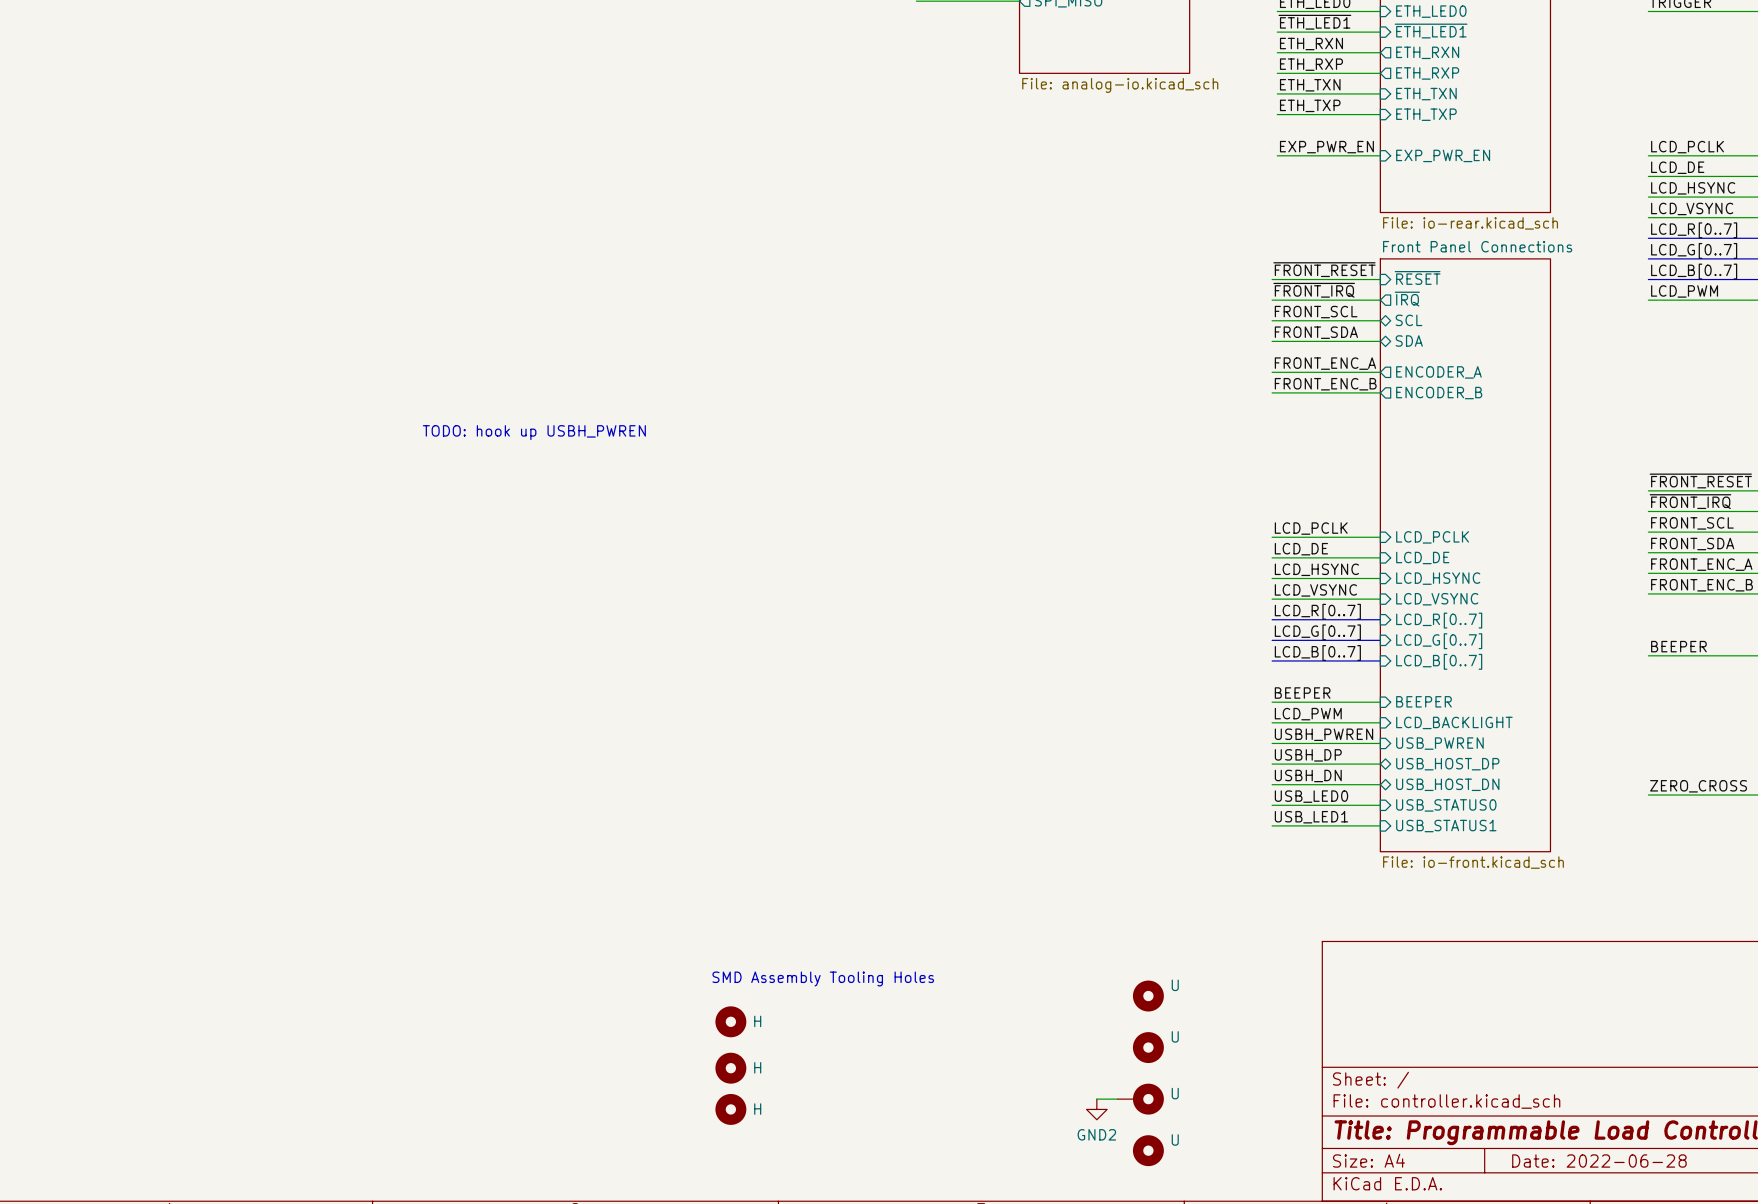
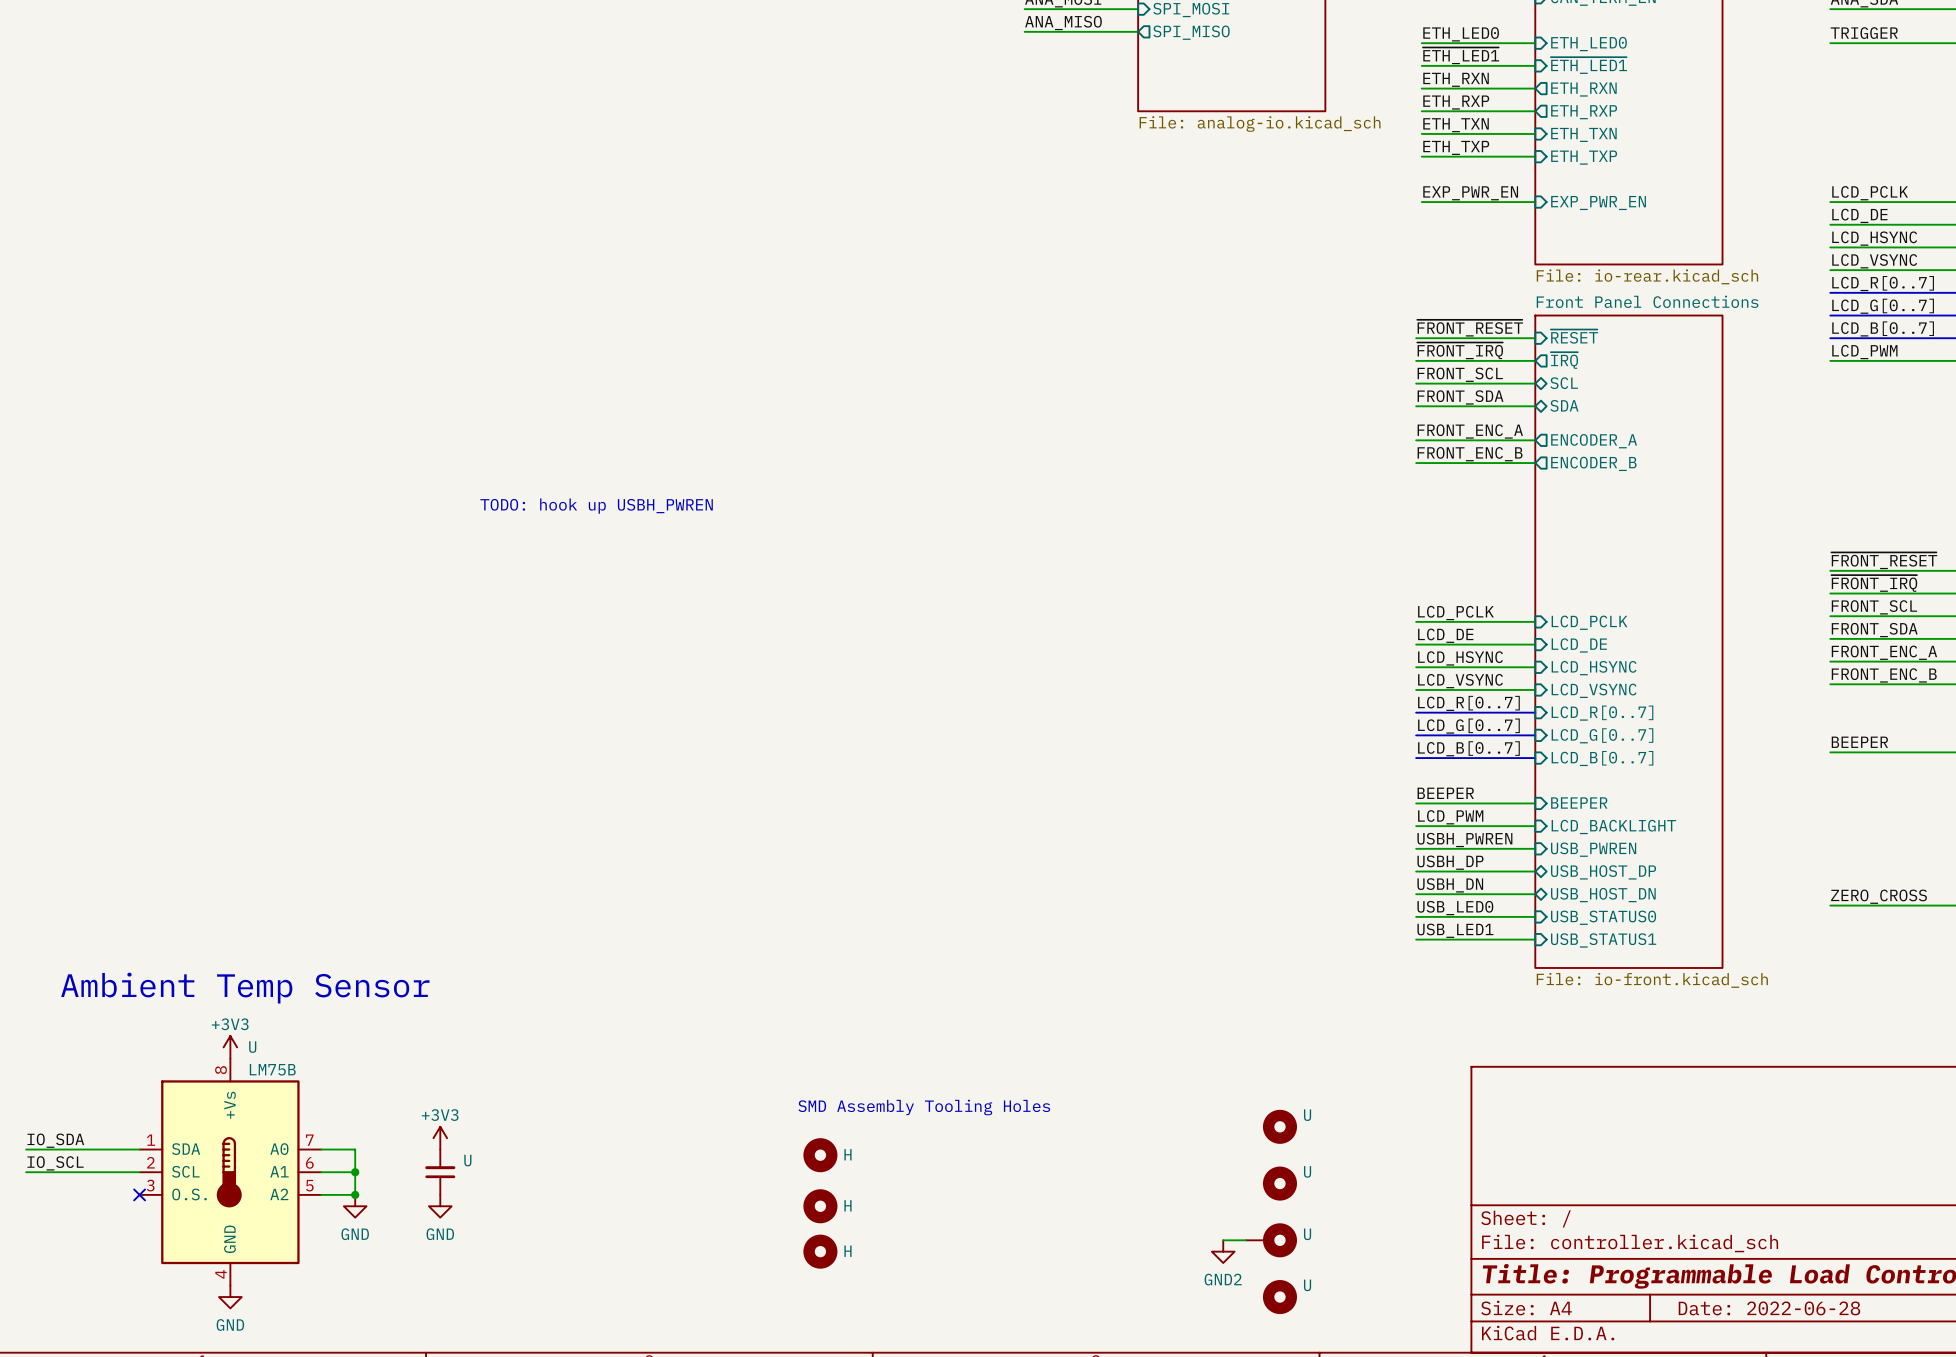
text: none -> Ambient Temp Sensor (245, 988)
power symbol: none -> +3V3 (230, 1047)
power symbol: none -> +3V3 (440, 1138)
label: none -> IO_SDA (55, 1140)
wire: none -> (26, 1149) (139, 1149)
wire: none -> (321, 1149) (355, 1149) (355, 1194) (321, 1194)
label: none -> IO_SCL (55, 1163)
wire: none -> (26, 1172) (139, 1172)
U: none -> LM75B (230, 1172)
wire: none -> (321, 1172) (355, 1172)
junction: none -> (355, 1172)
U: none -> (440, 1172)
no-connect mark: none -> (139, 1194)
junction: none -> (355, 1194)
power symbol: none -> GND (355, 1206)
power symbol: none -> GND (440, 1206)
power symbol: none -> GND (230, 1297)

